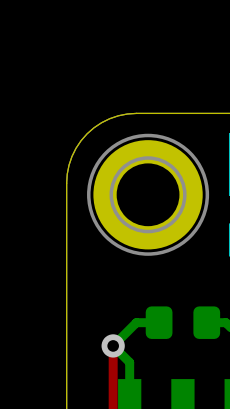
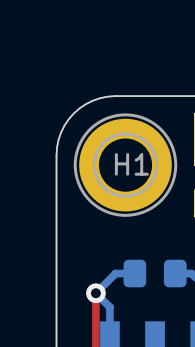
H1 name: none -> H1 (131, 164)

